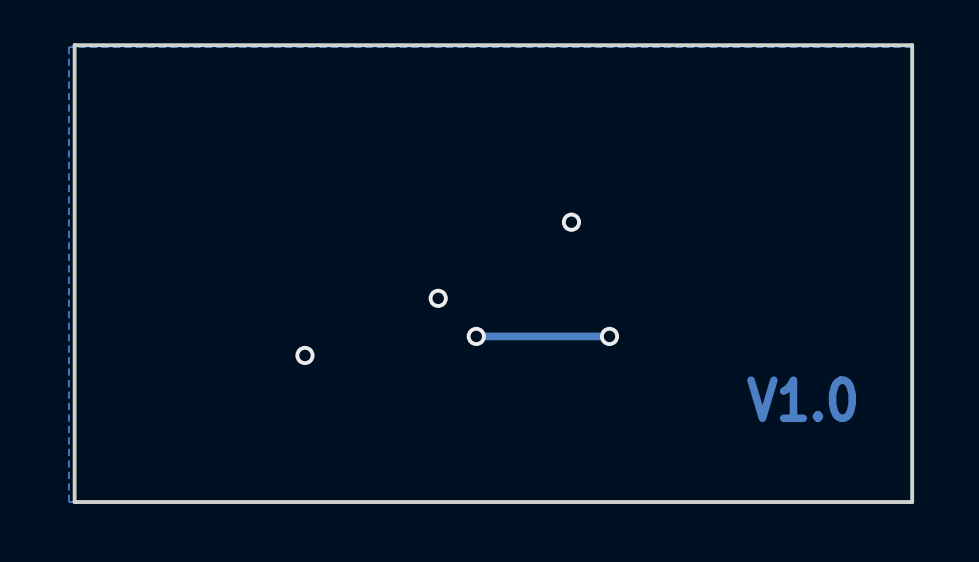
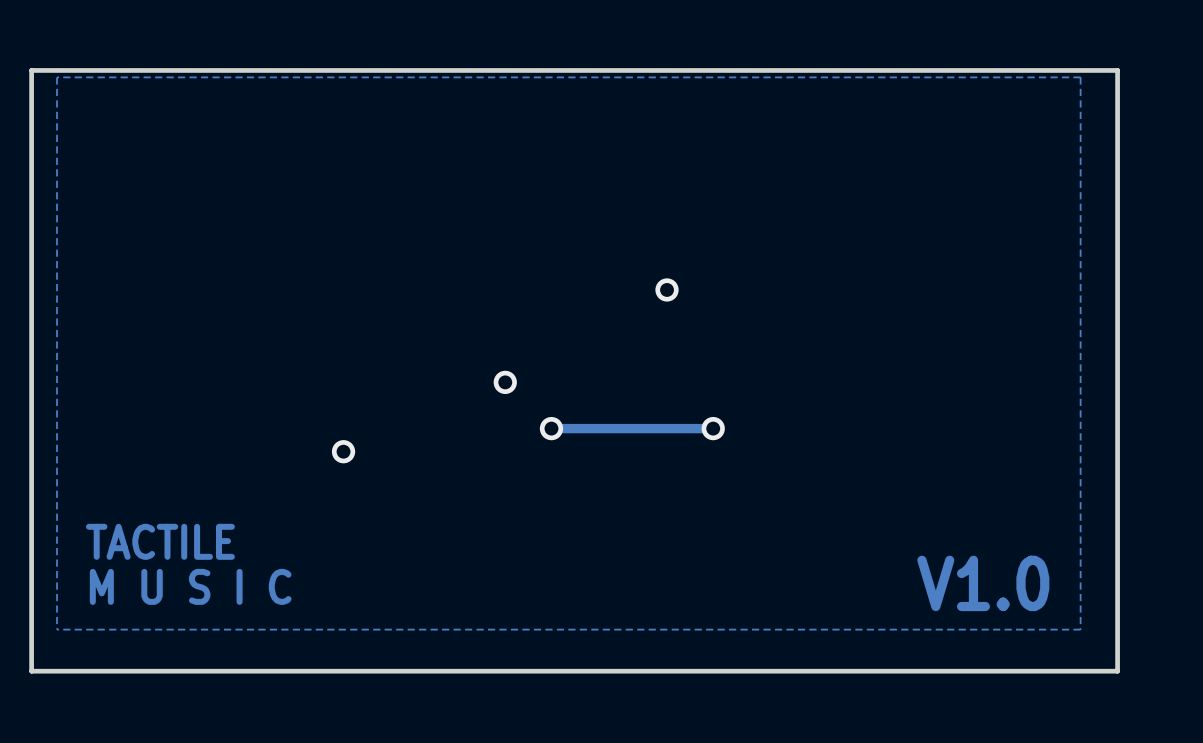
board edge: (912, 45) (912, 502) (74, 502) (74, 45) (912, 45) -> (1117, 70) (1117, 671) (31, 671) (31, 70) (1117, 70)
text position: V1.0 (801, 399) -> V1.0 (983, 583)
text: none -> TACTILE (160, 541)
text: none -> M U S I C (190, 586)

